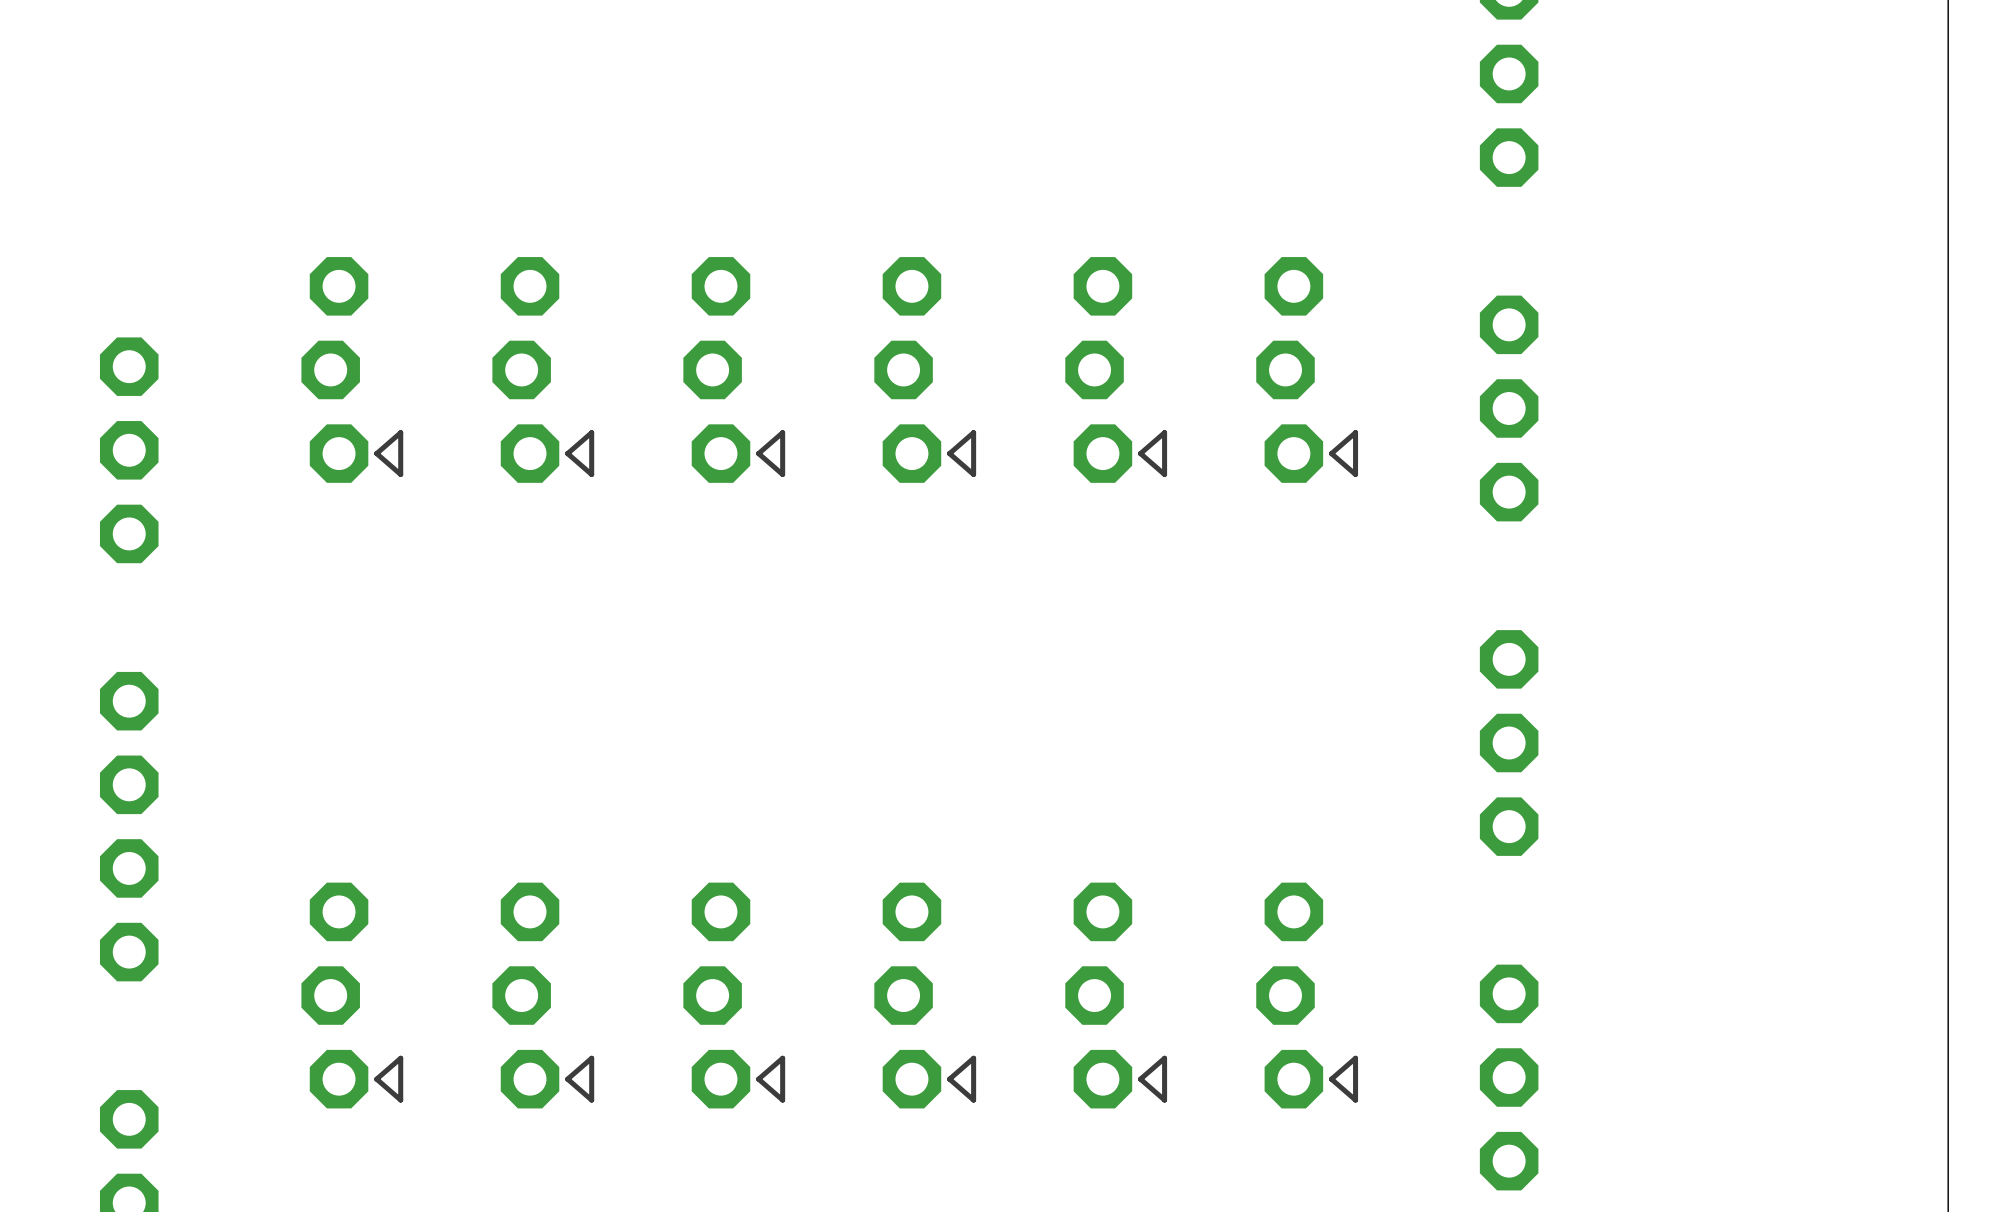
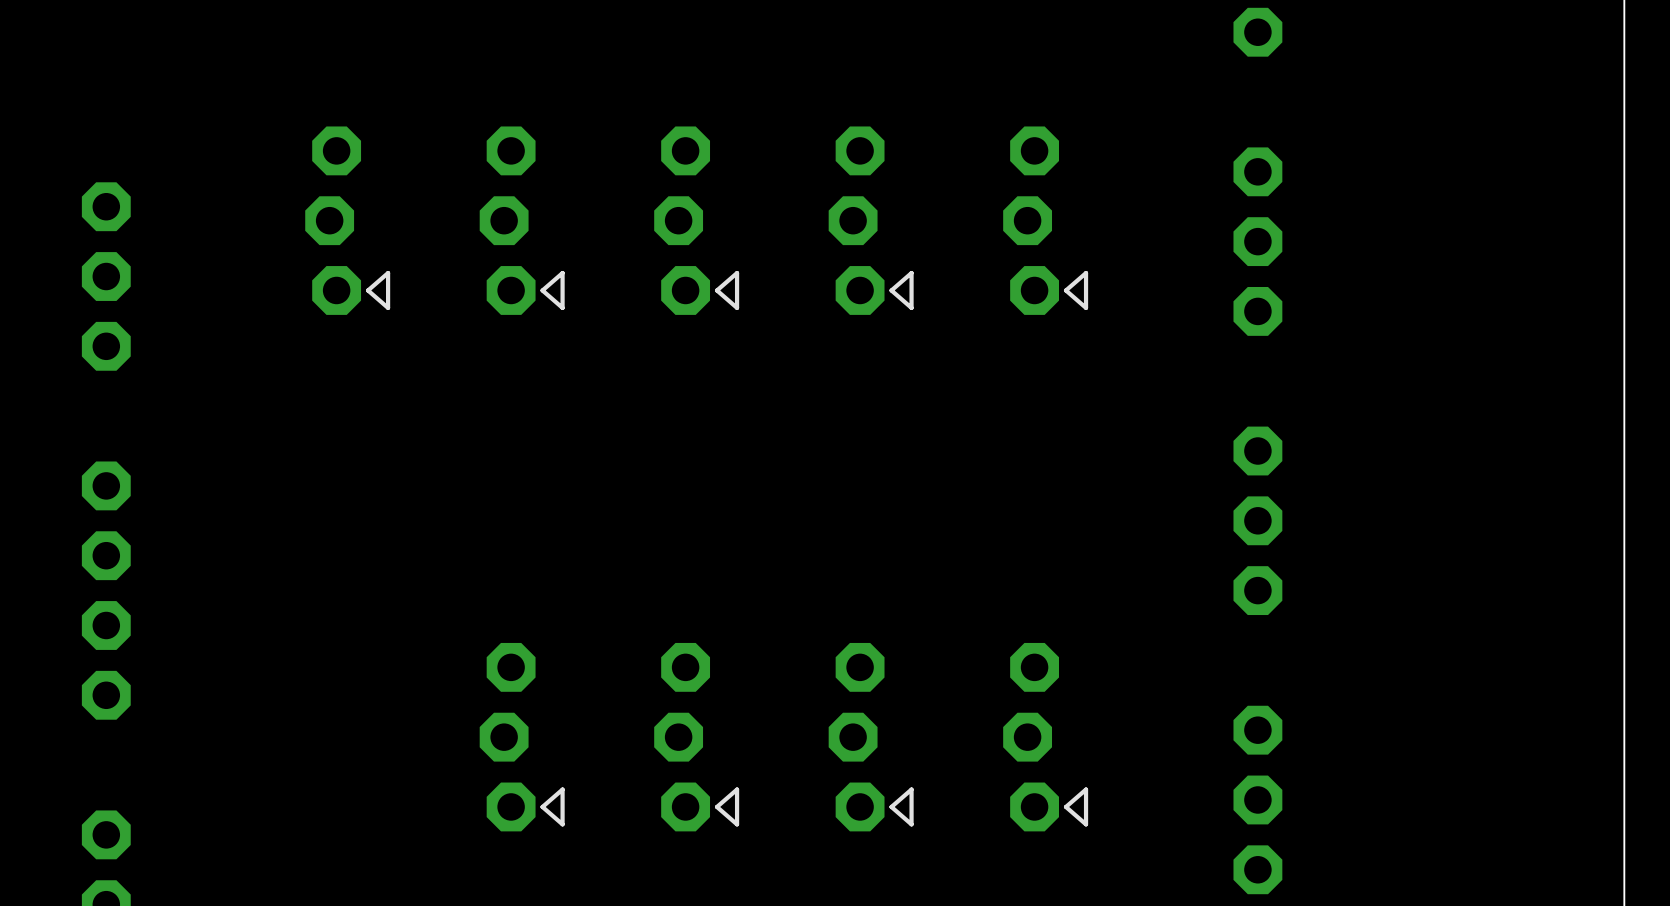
part: (352, 369) -> none
part: (543, 369) -> none
part: (734, 369) -> none
part: (925, 369) -> none
part: (1116, 369) -> none
part position: (1307, 369) -> (1045, 220)
part: none -> (347, 220)
part: none -> (522, 220)
part: none -> (696, 220)
part: none -> (871, 220)
part: (352, 995) -> none
part: (543, 995) -> none
part: (734, 995) -> none
part: (925, 995) -> none
part: (1116, 995) -> none
part position: (1307, 995) -> (1045, 737)
part: none -> (522, 737)
part: none -> (696, 737)
part: none -> (871, 737)

